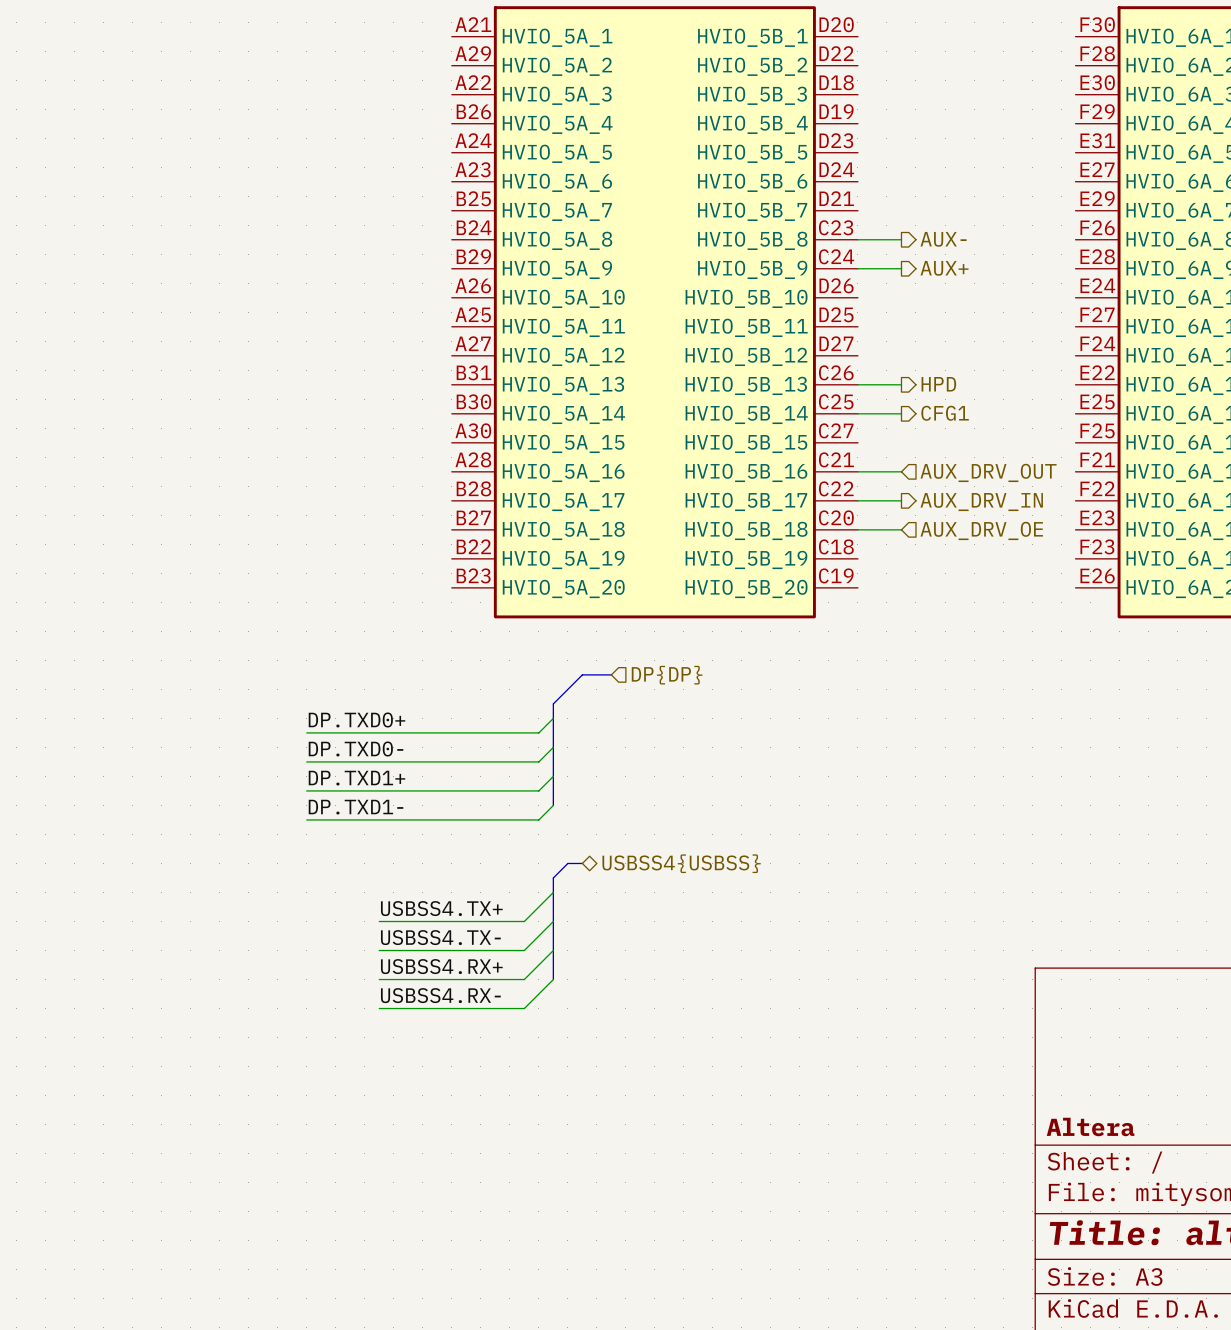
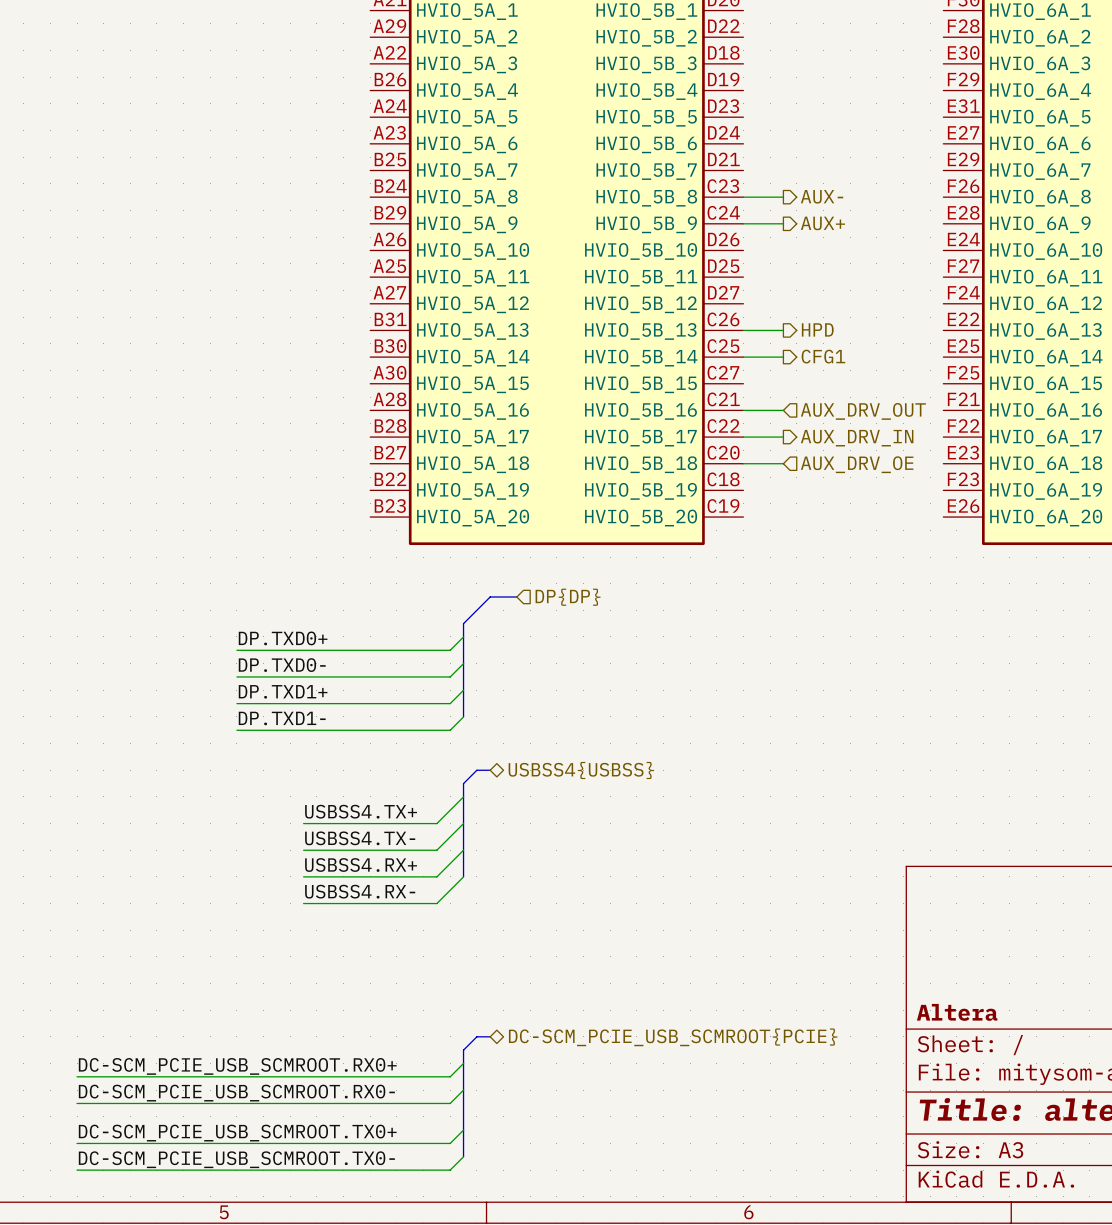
bus: none -> (490, 1036) (476, 1036) (463, 1050) (463, 1156)
hierarchical label: none -> DC-SCM_PCIE_USB_SCMROOT{PCIE} (673, 1037)
wire: none -> (463, 1063) (450, 1076) (77, 1076)
label: none -> DC-SCM_PCIE_USB_SCMROOT.RX0+ (237, 1066)
wire: none -> (463, 1090) (450, 1103) (77, 1103)
label: none -> DC-SCM_PCIE_USB_SCMROOT.RX0- (236, 1093)
wire: none -> (463, 1130) (450, 1143) (77, 1143)
label: none -> DC-SCM_PCIE_USB_SCMROOT.TX0+ (237, 1133)
wire: none -> (463, 1156) (450, 1170) (77, 1170)
label: none -> DC-SCM_PCIE_USB_SCMROOT.TX0- (236, 1159)

